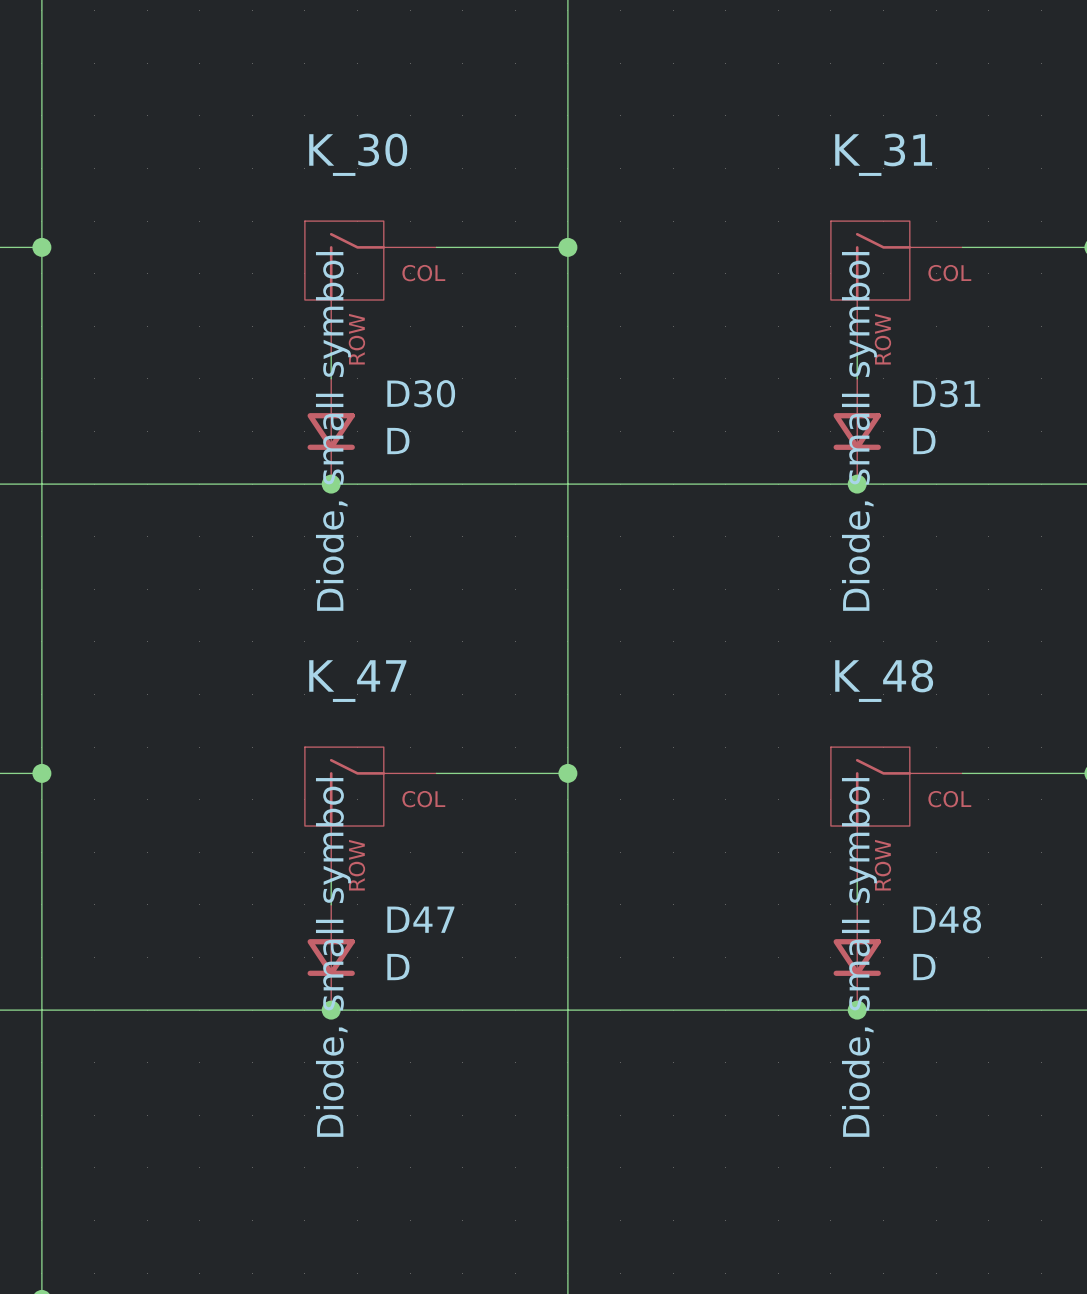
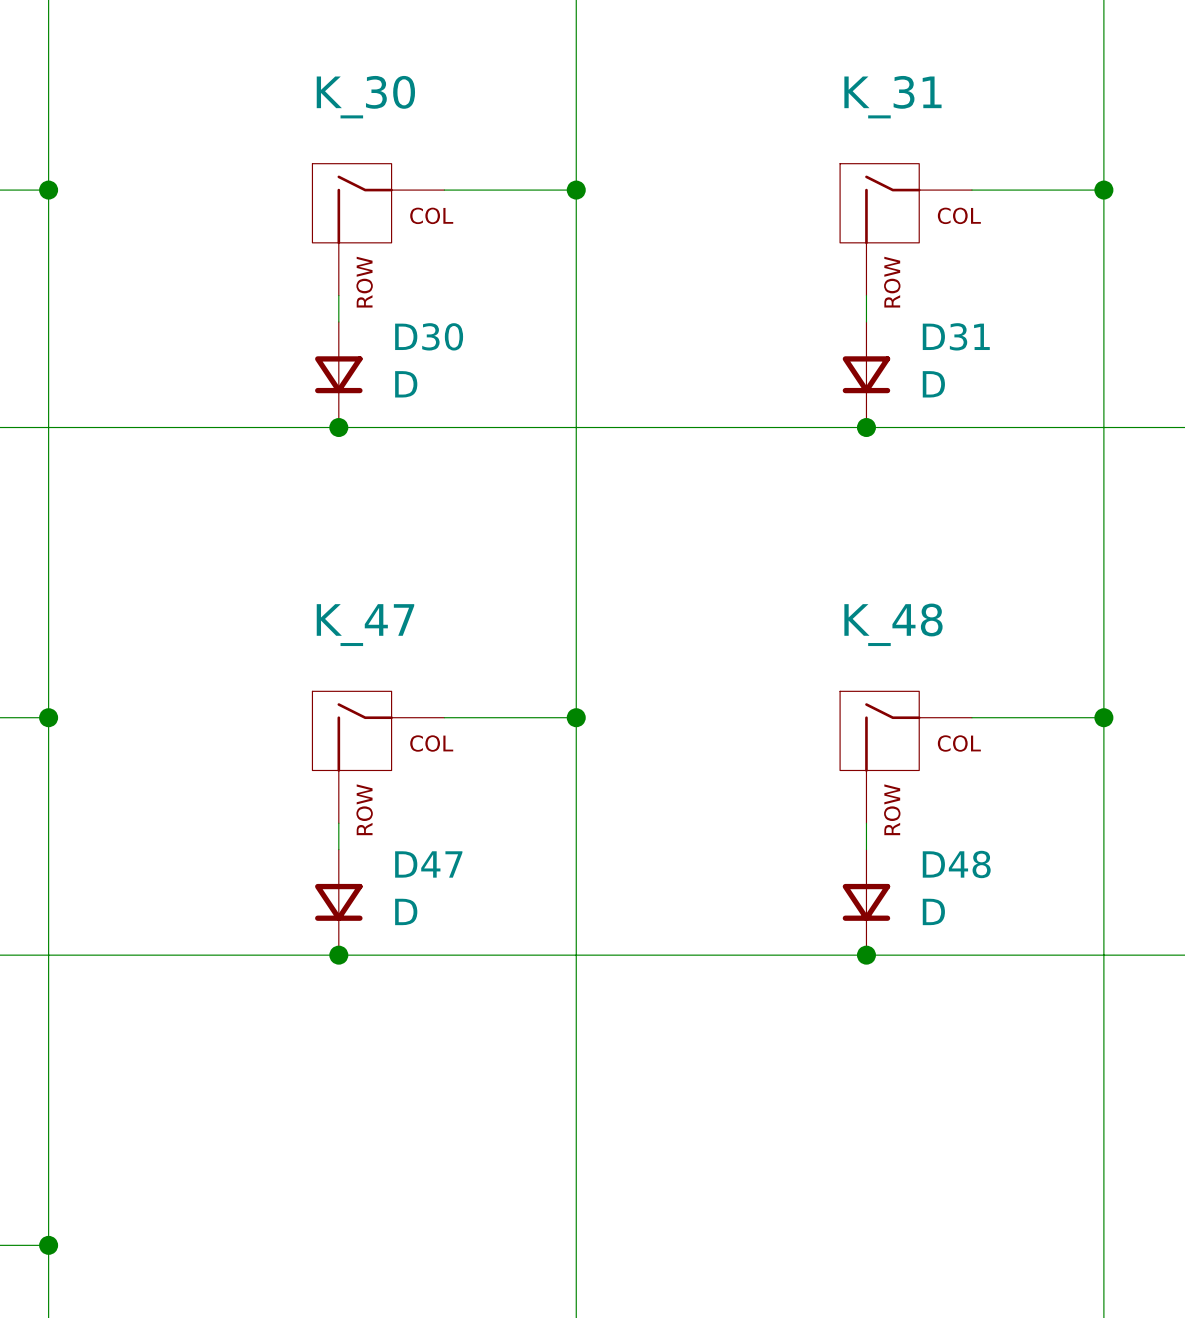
D30 text: Diode, small symbol (333, 431) -> none
D31 text: Diode, small symbol (859, 431) -> none
D47 text: Diode, small symbol (333, 957) -> none
D48 text: Diode, small symbol (859, 957) -> none

